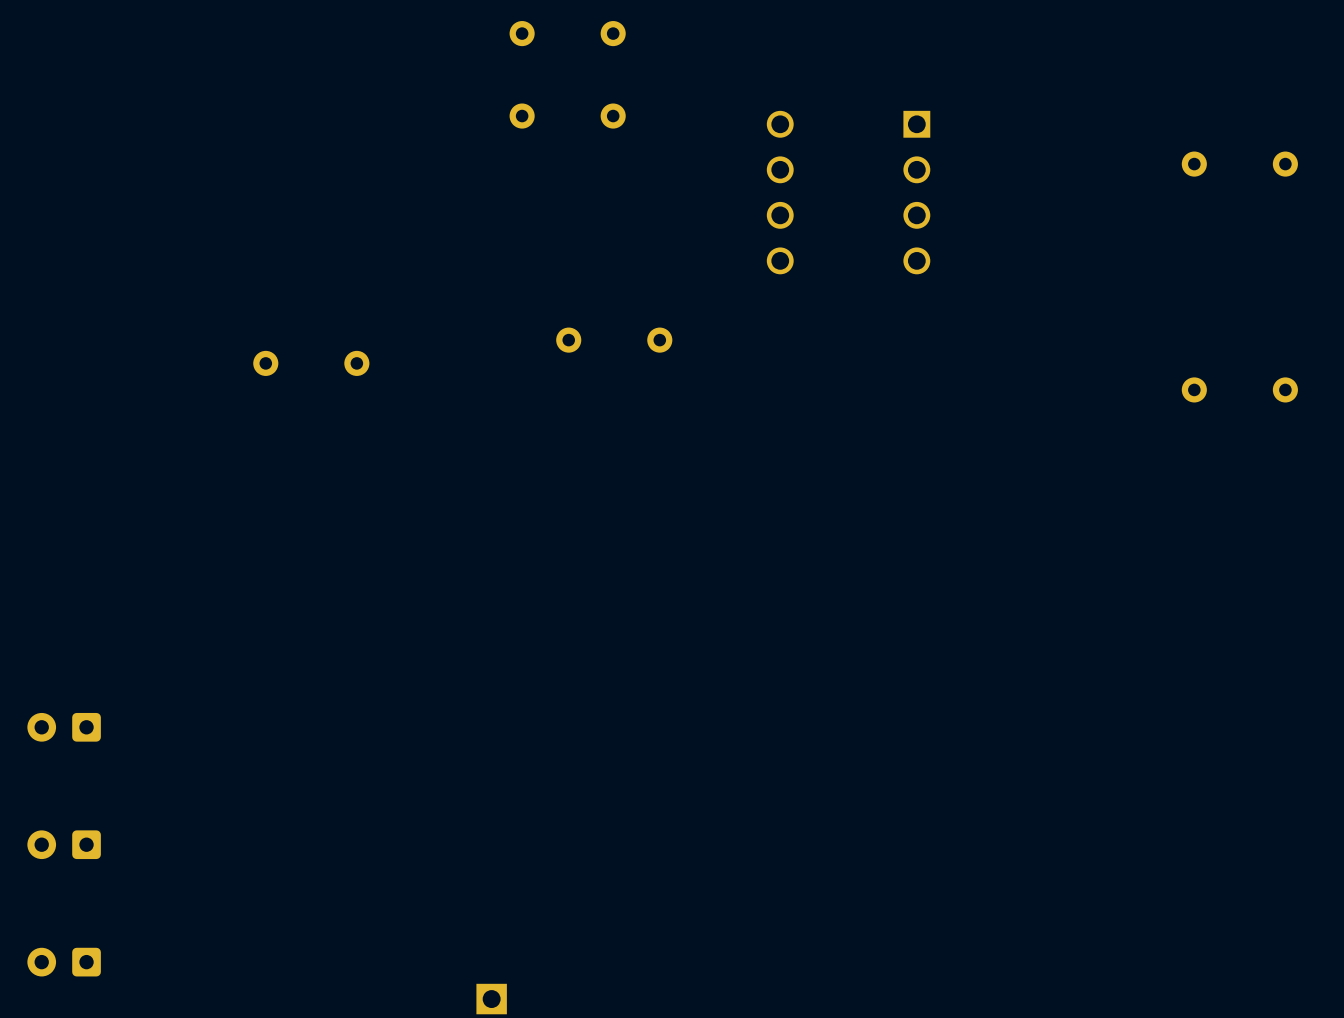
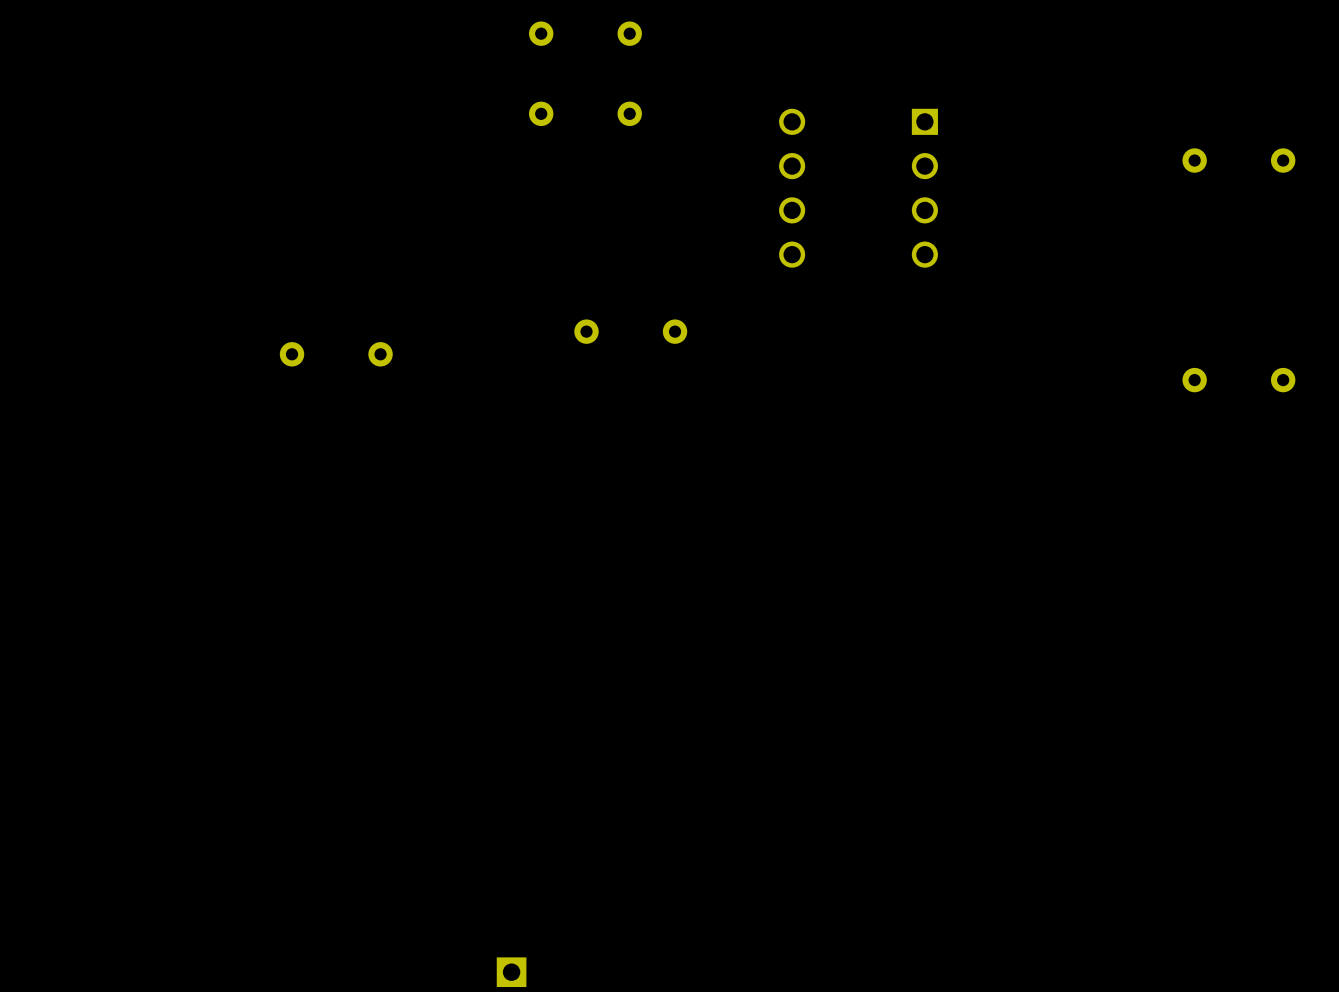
part: (64, 727) -> none
part: (64, 844) -> none
part: (64, 962) -> none

